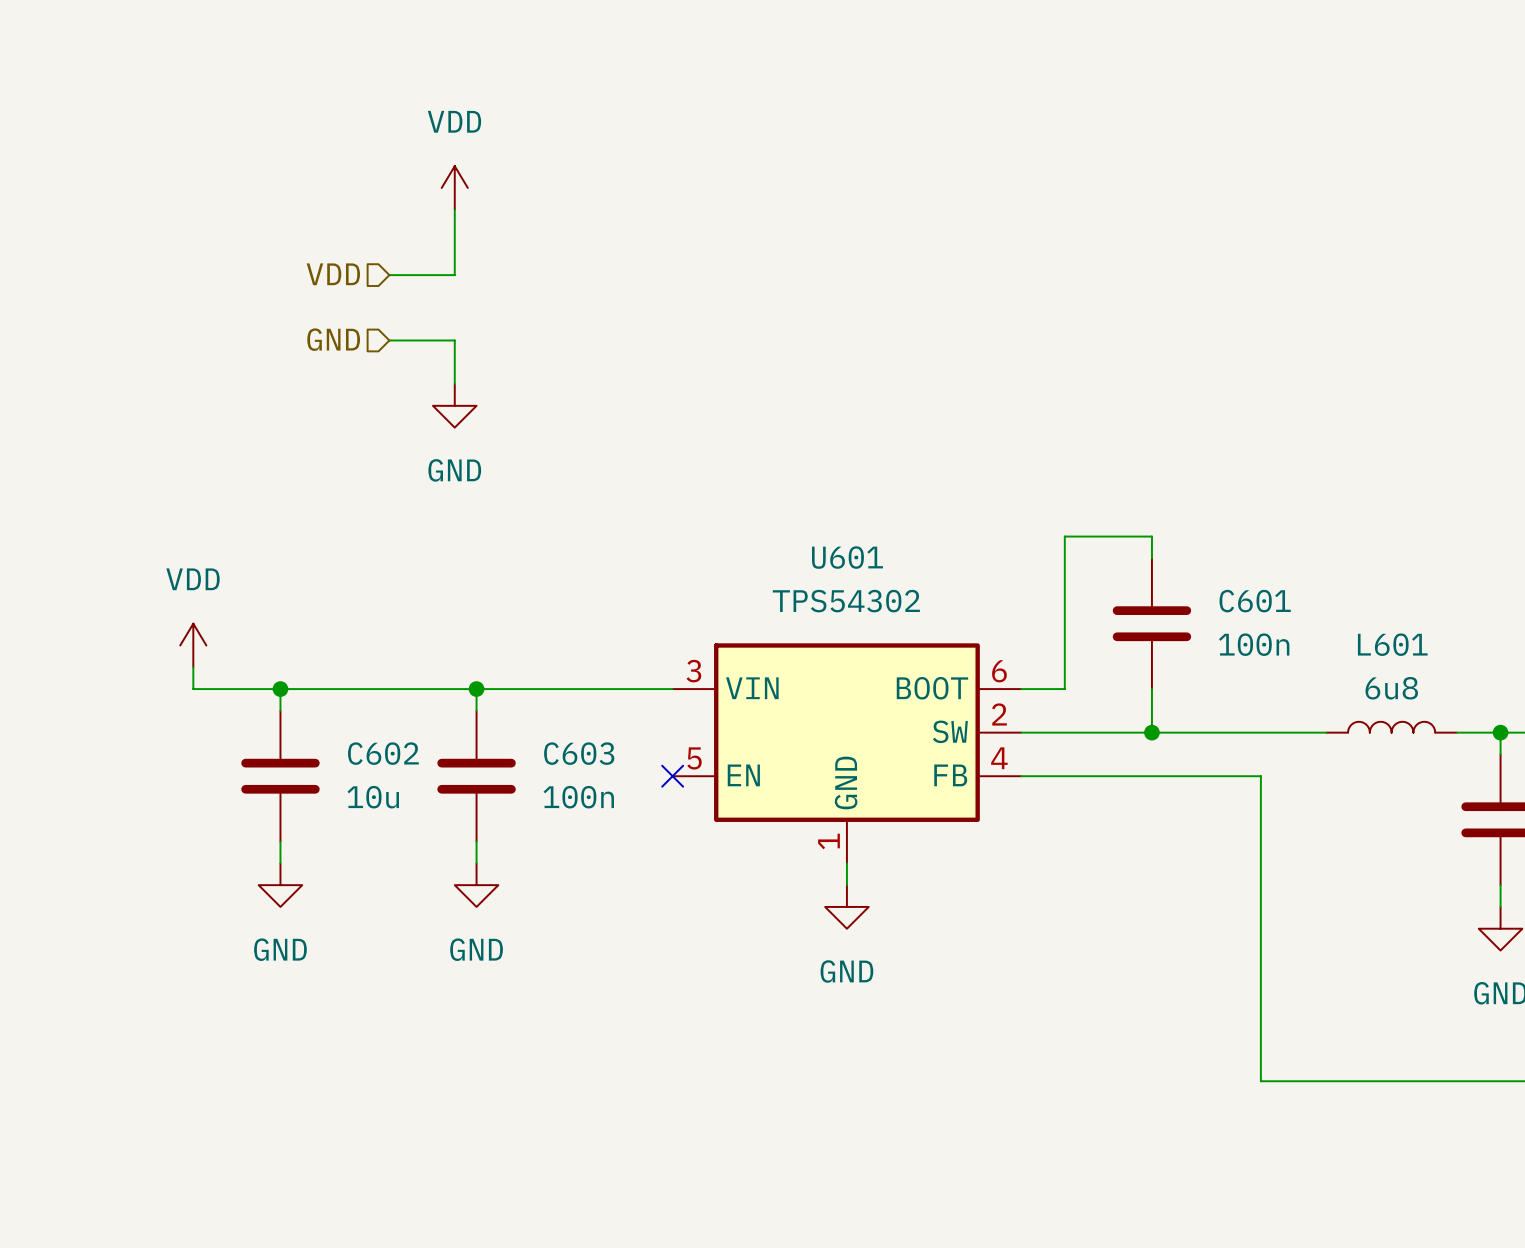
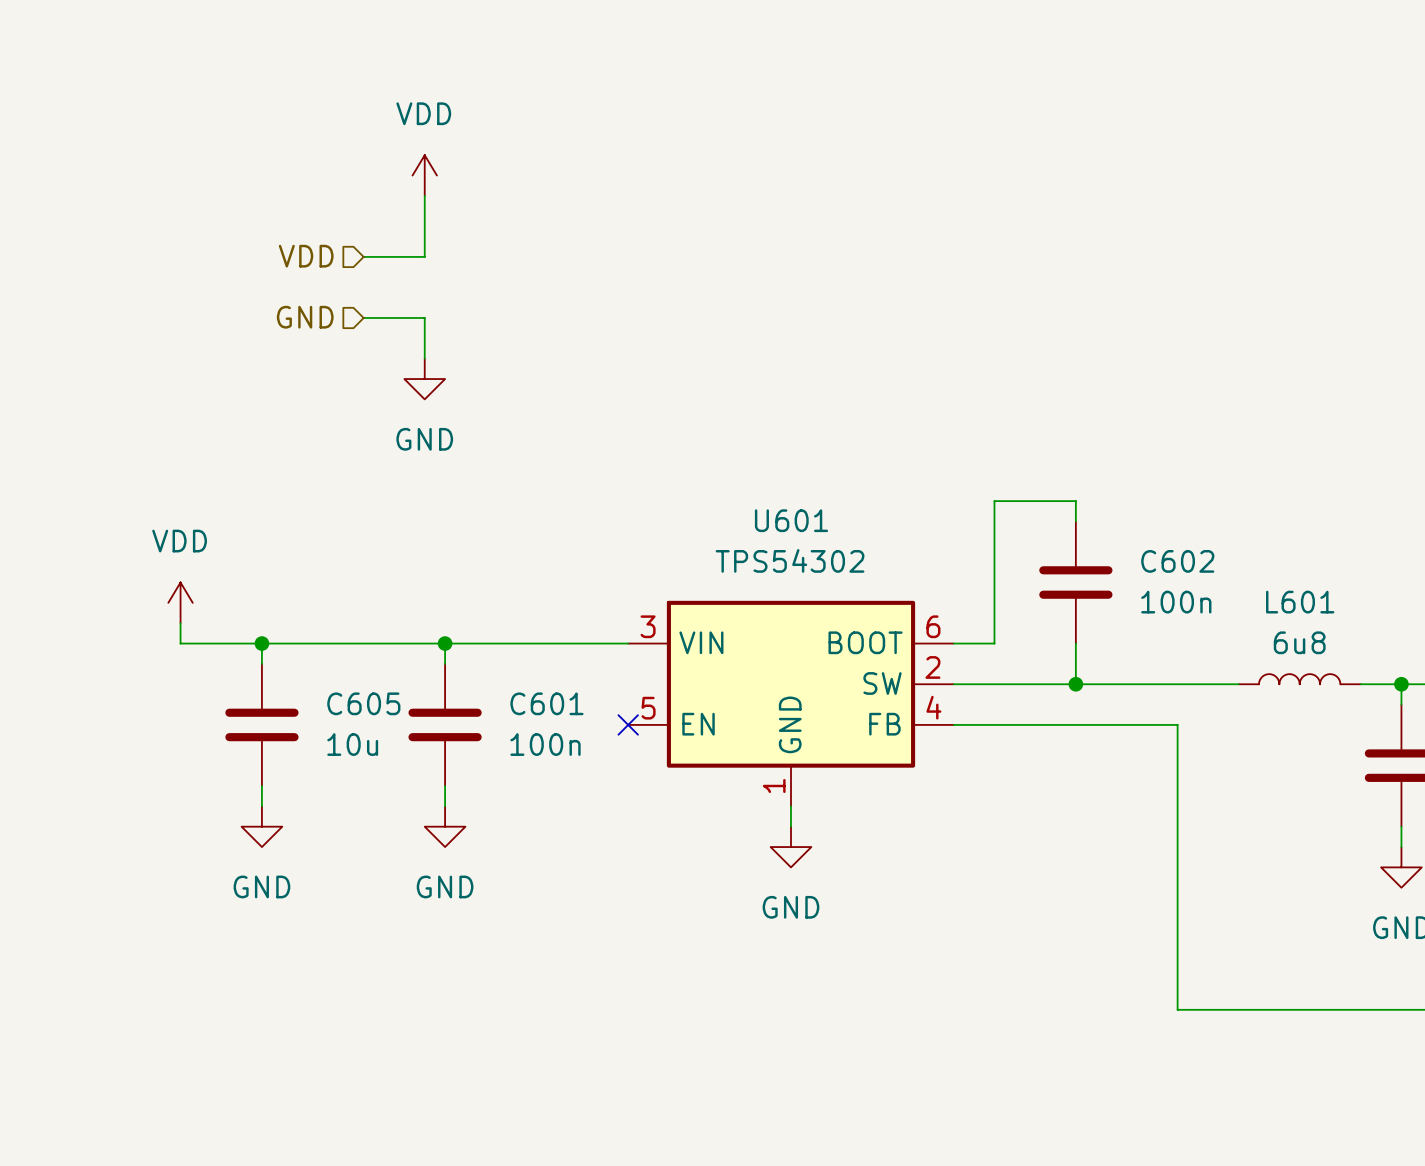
C601 name: C601 (1255, 601) -> C602 (1177, 561)
C602 name: C602 (383, 753) -> C605 (363, 703)
C603 name: C603 (579, 753) -> C601 (546, 703)

